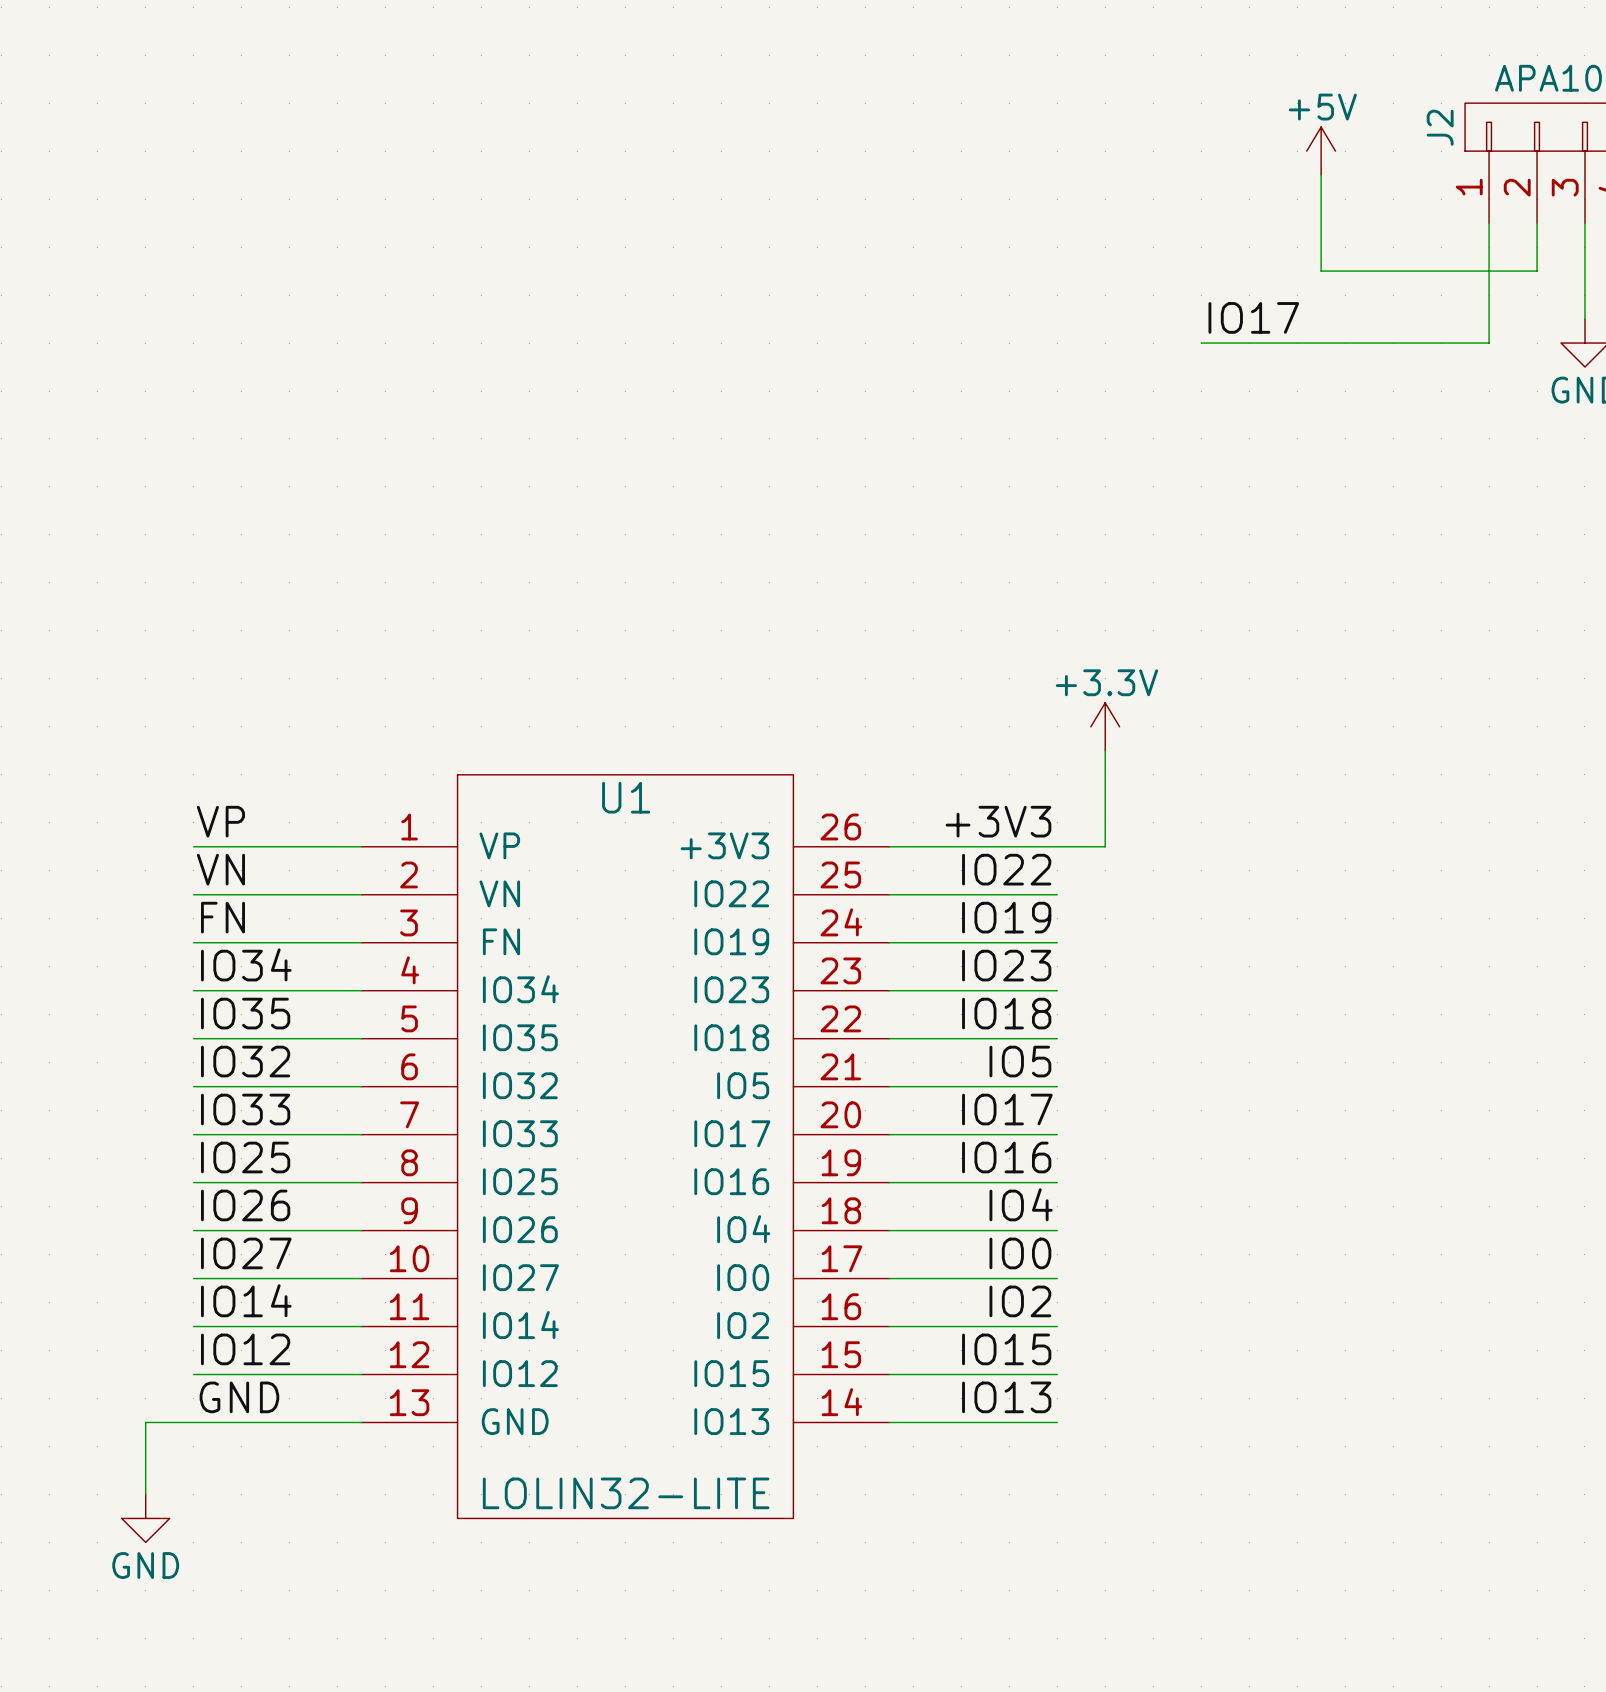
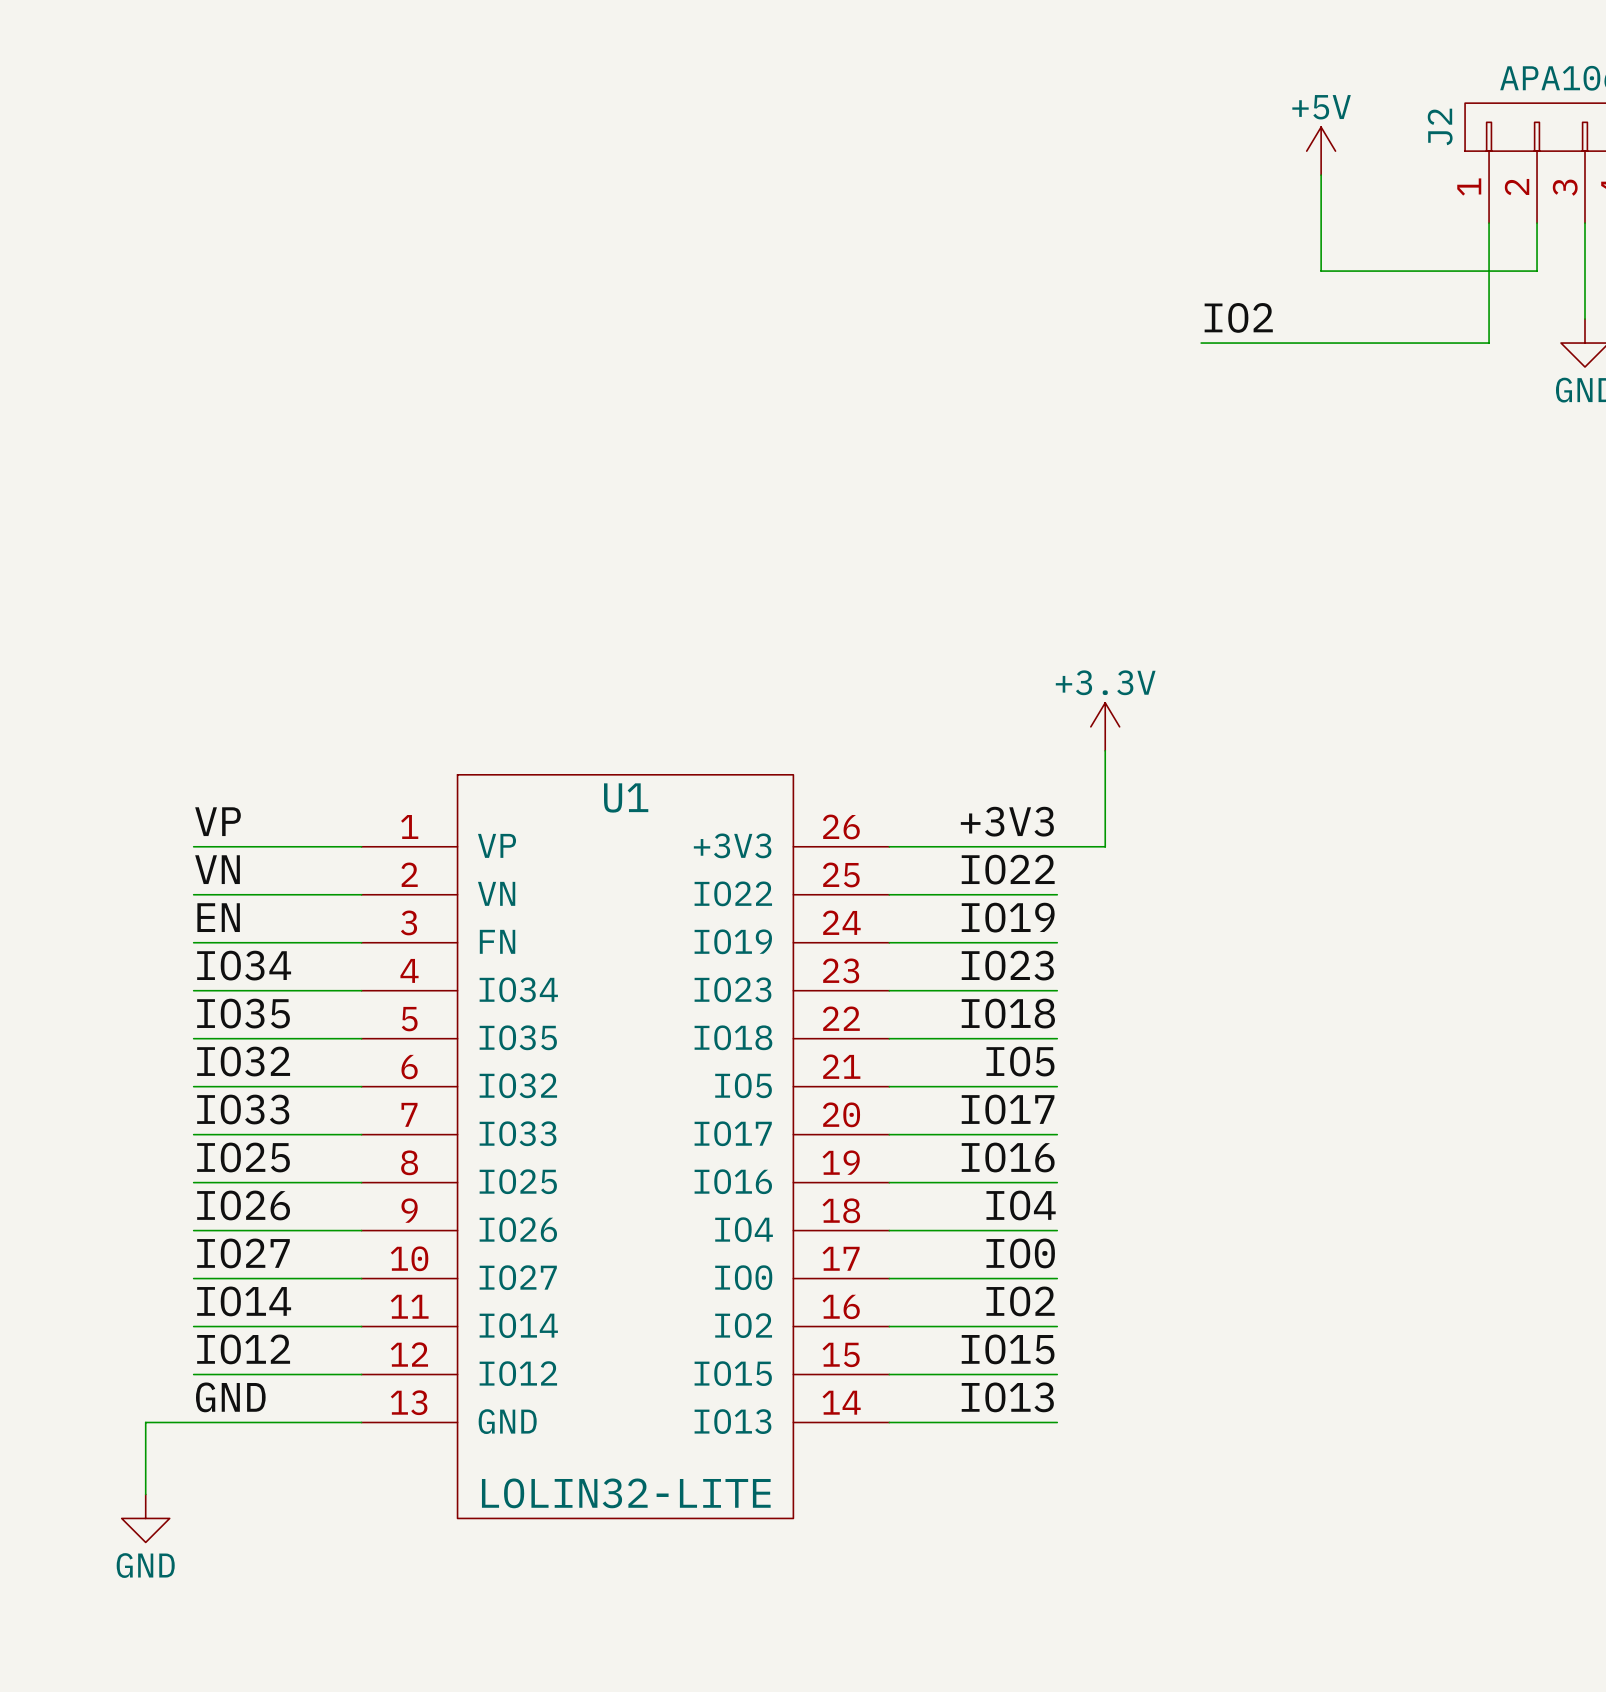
label: IO17 (1253, 317) -> IO2 (1238, 317)
label: FN (222, 917) -> EN (218, 917)

